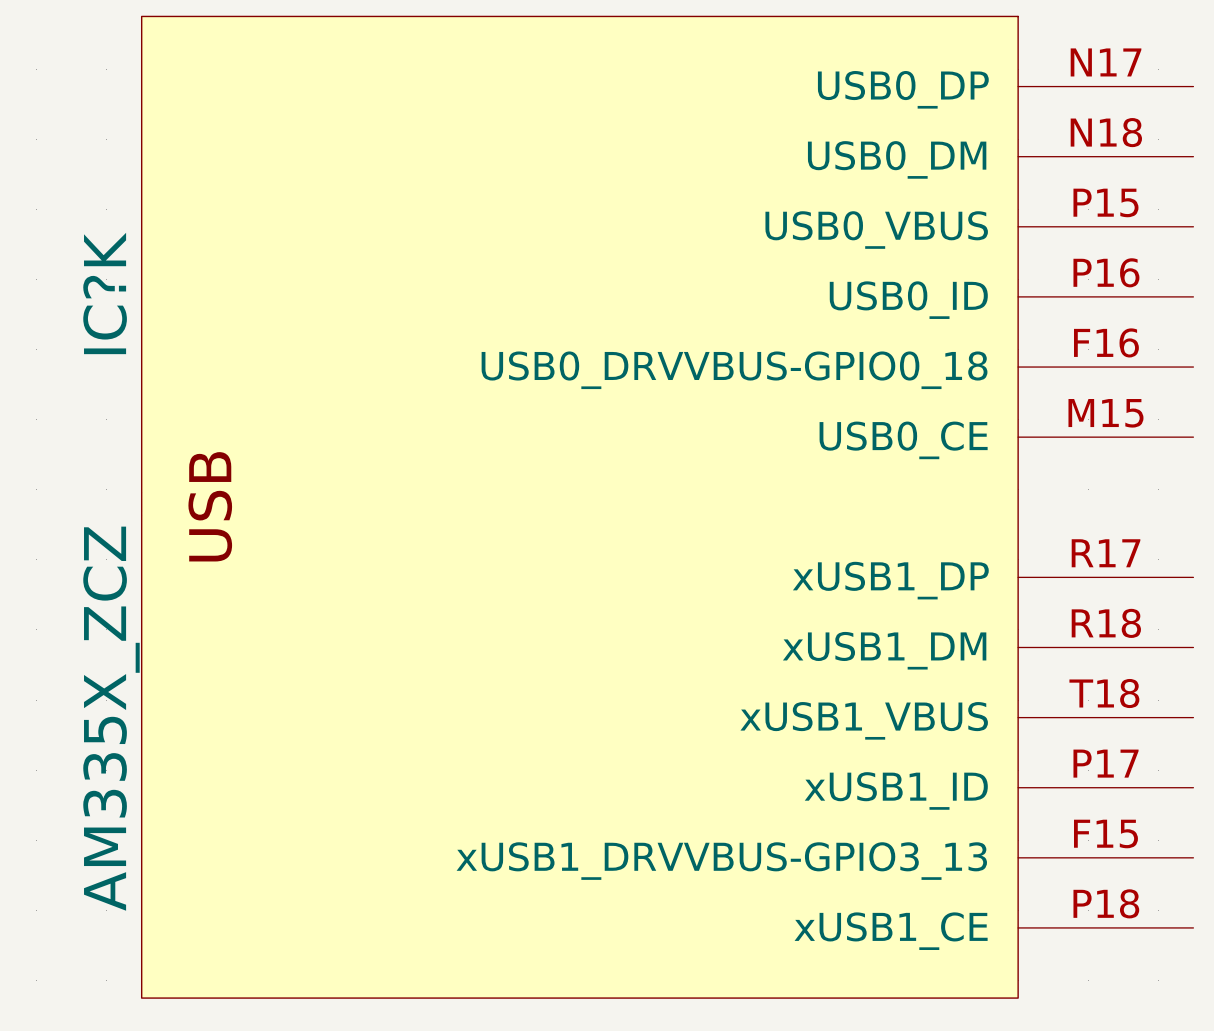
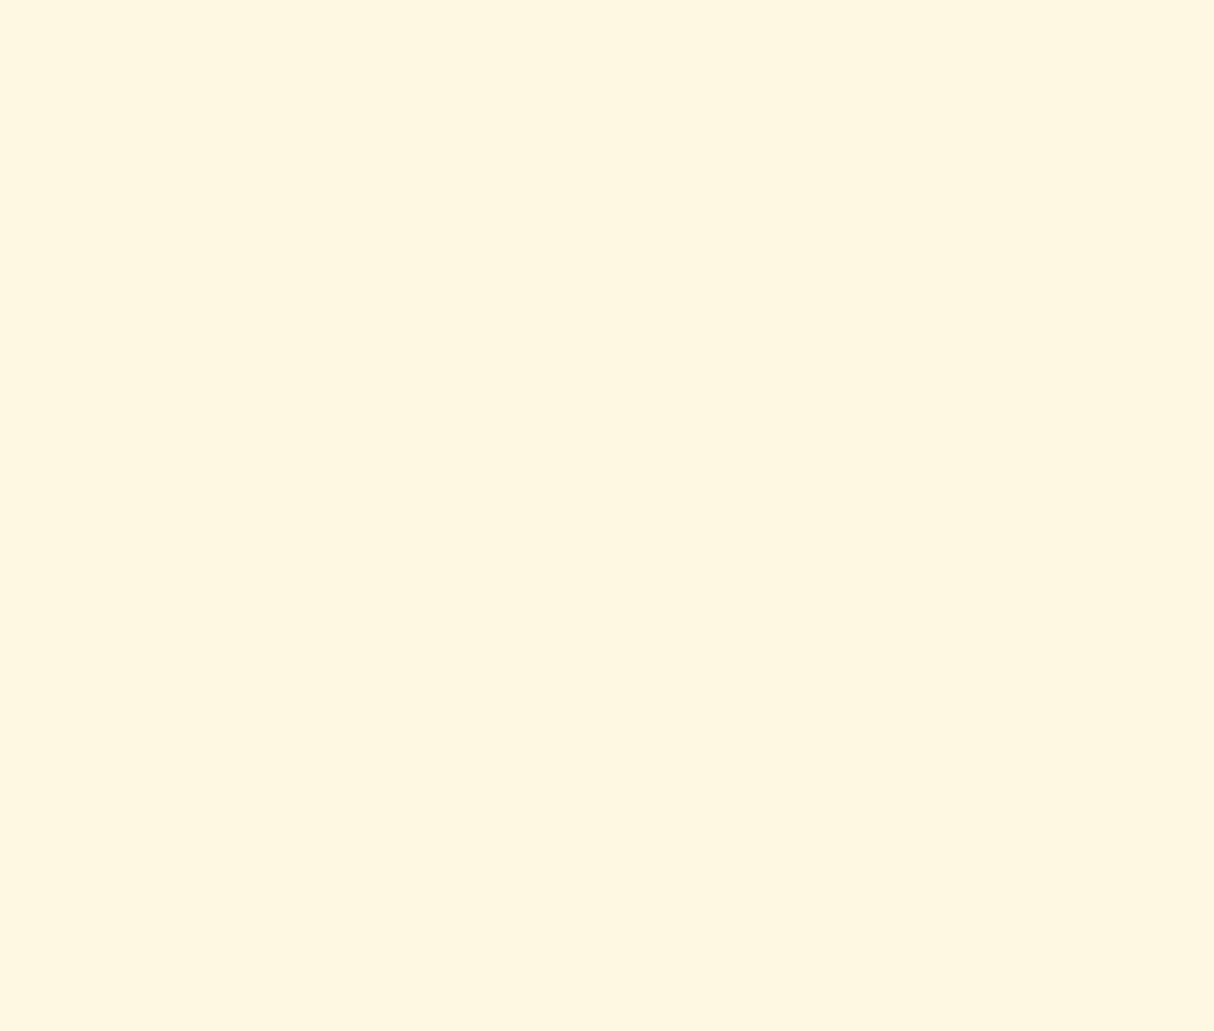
IC?K: AM335X_ZCZ (667, 507) -> none

